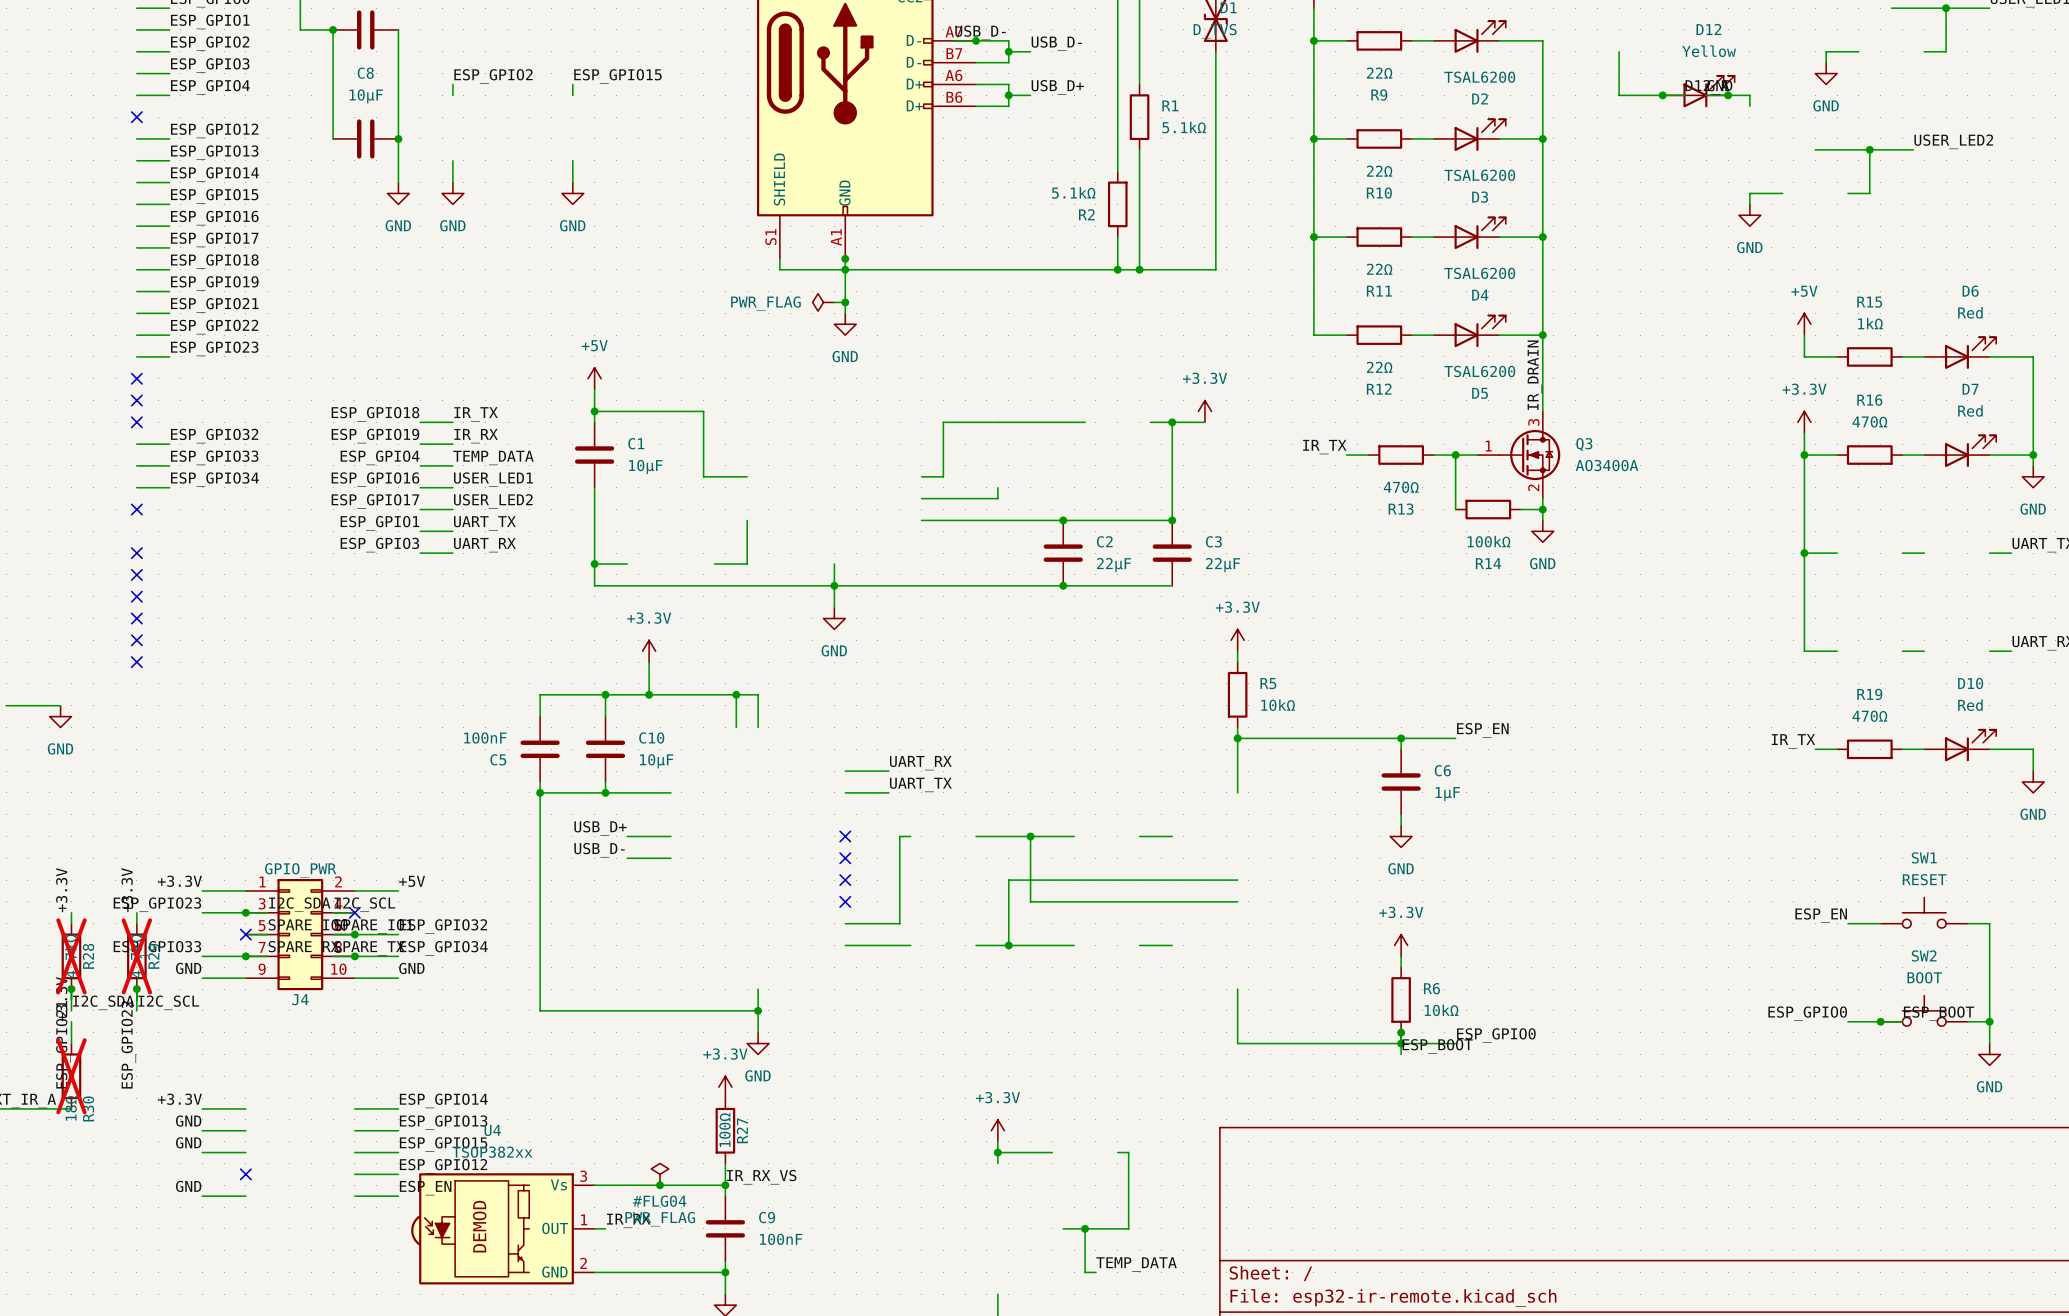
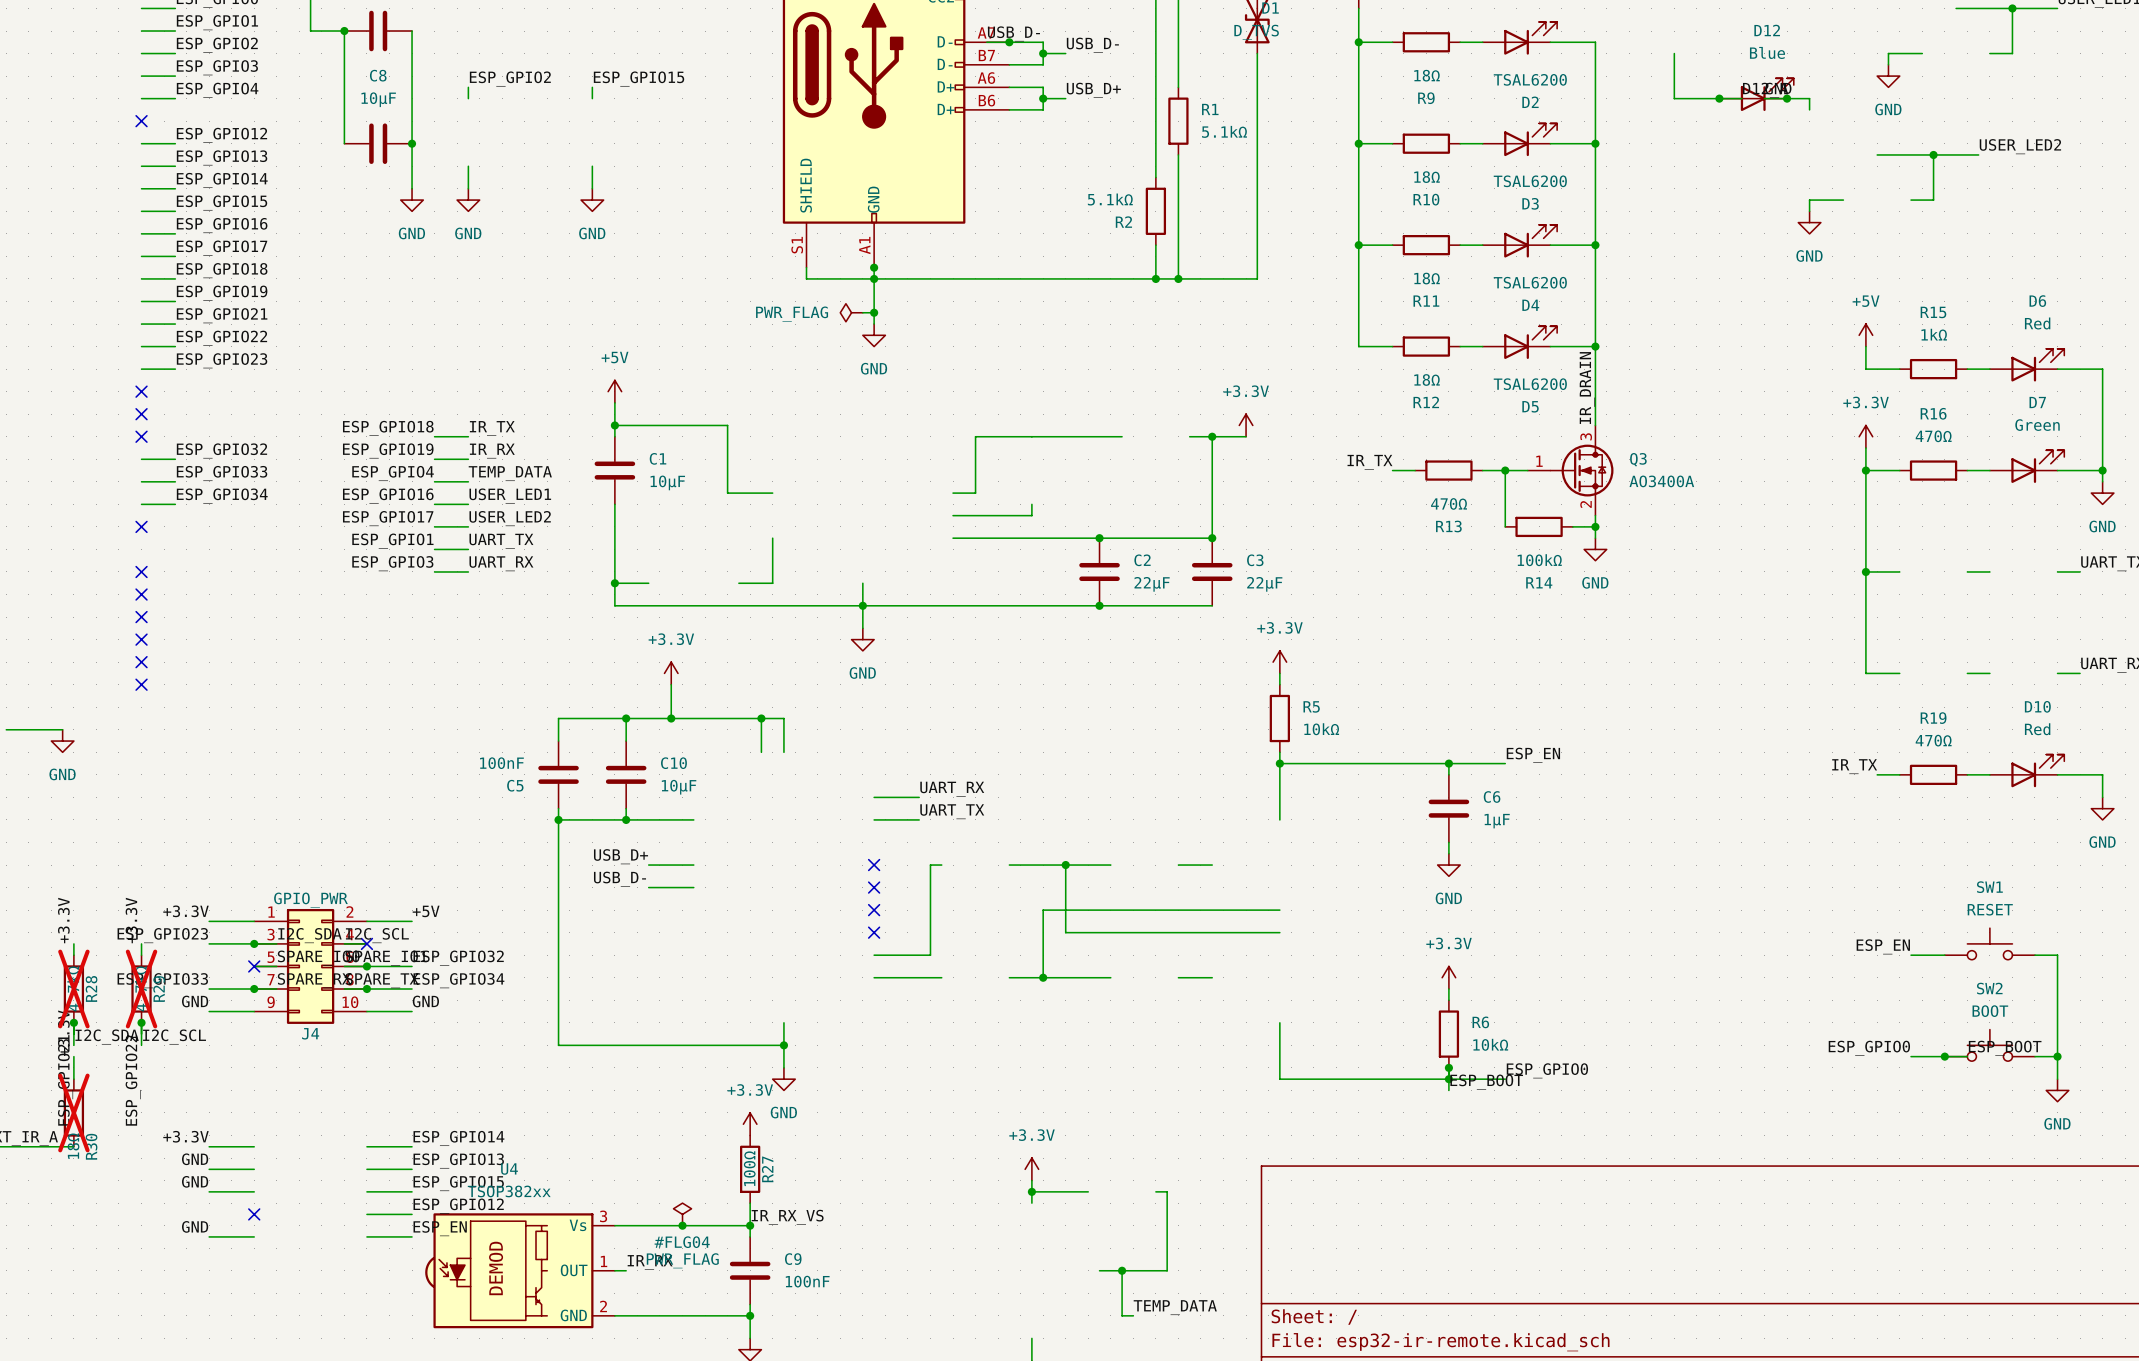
D12 value: Yellow (1709, 51) -> Blue (1767, 52)
R9 value: 22Ω (1379, 73) -> 18Ω (1427, 75)
R10 value: 22Ω (1379, 171) -> 18Ω (1427, 177)
R11 value: 22Ω (1379, 269) -> 18Ω (1427, 278)
R12 value: 22Ω (1379, 367) -> 18Ω (1427, 379)
D7 value: Red (1970, 410) -> Green (2037, 425)

